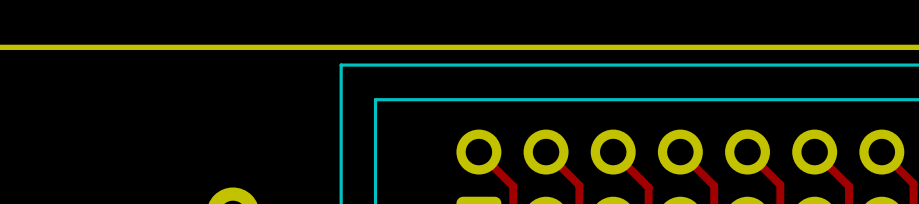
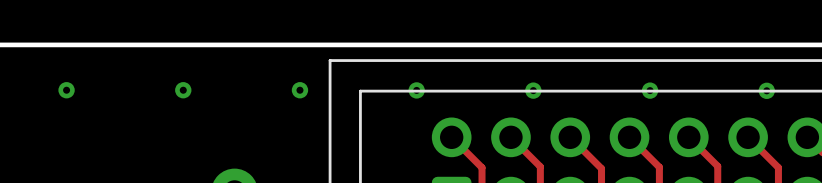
via: none -> (66, 90)
via: none -> (183, 90)
via: none -> (299, 90)
via: none -> (416, 90)
via: none -> (533, 90)
via: none -> (650, 90)
via: none -> (766, 90)

